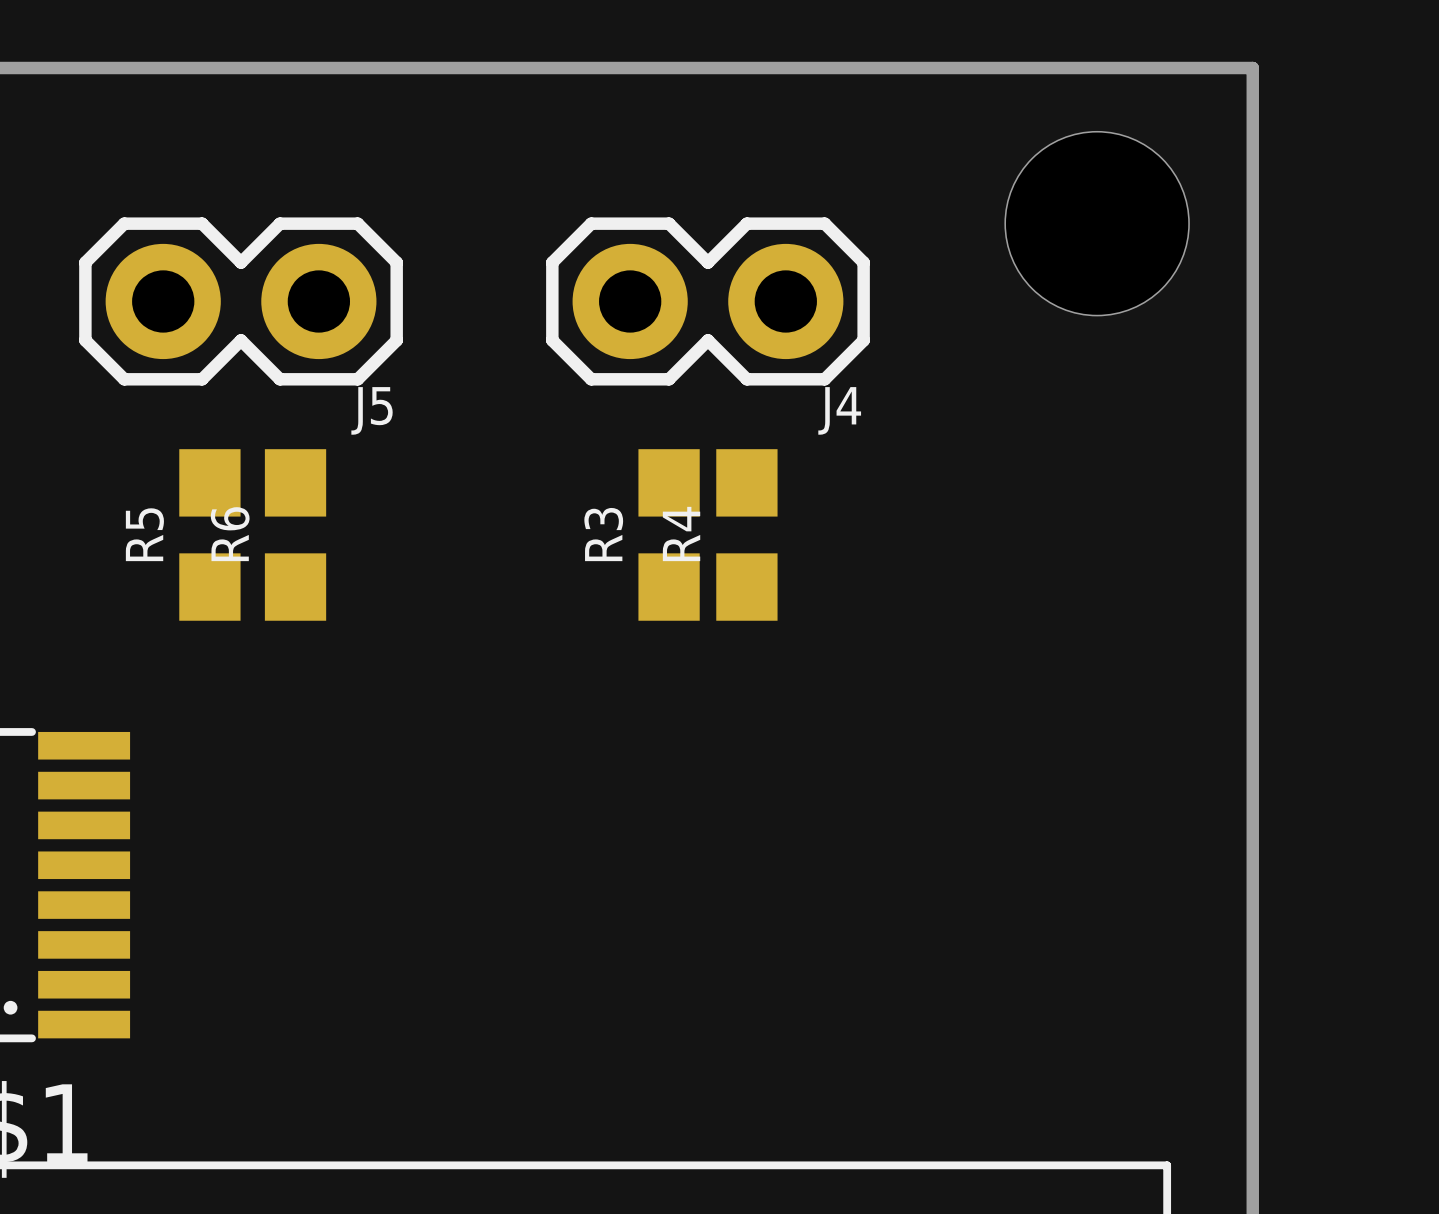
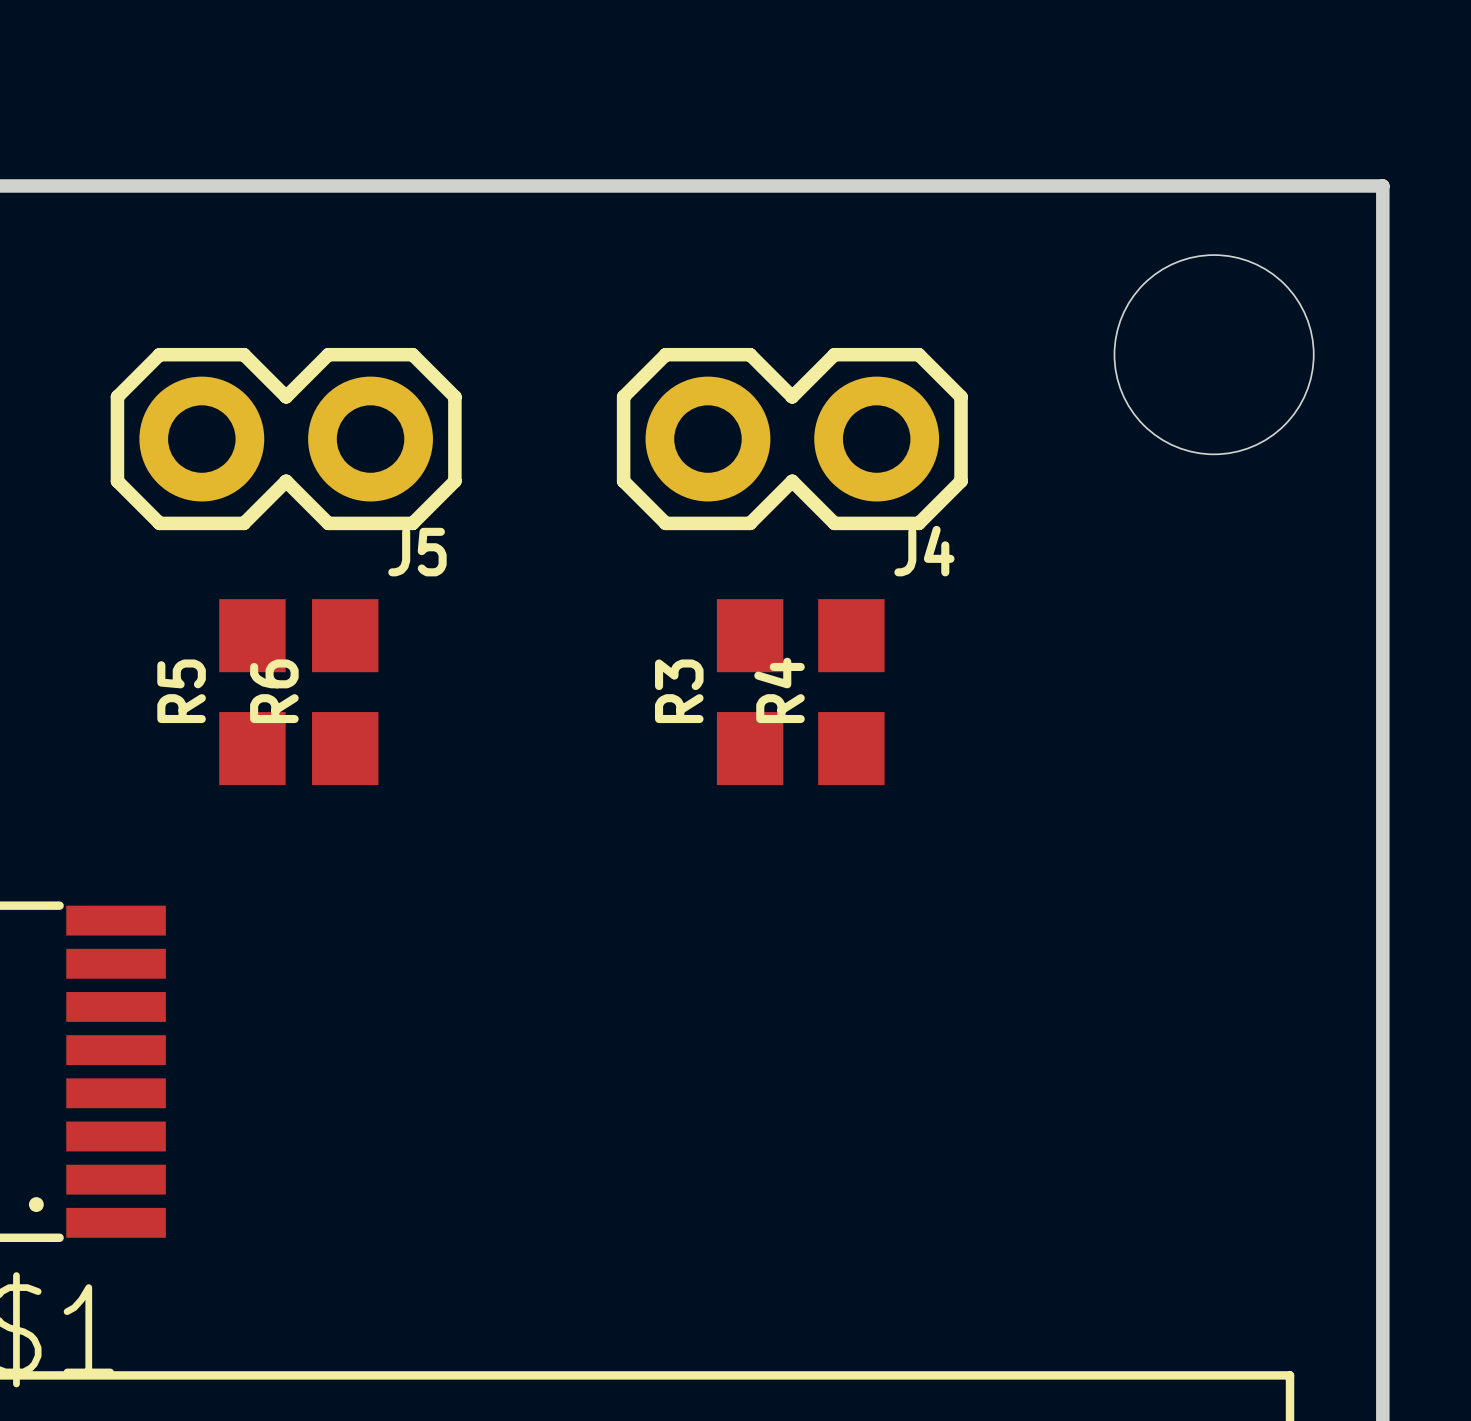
R4 position: (746, 534) -> (851, 692)

